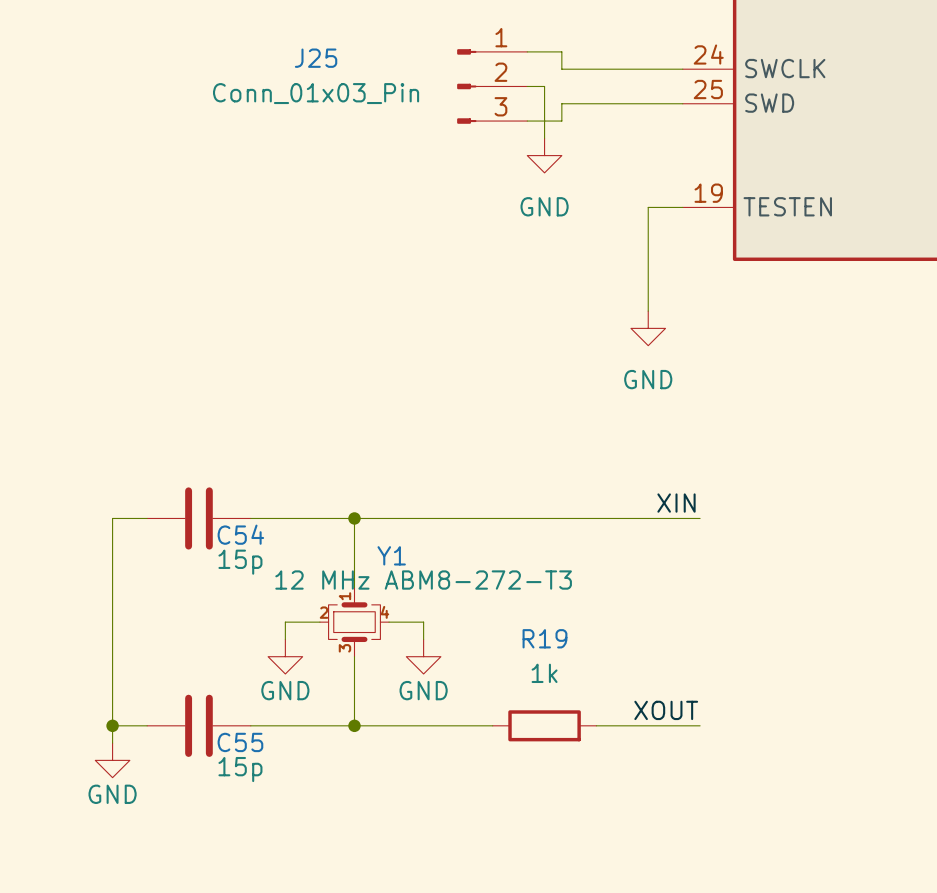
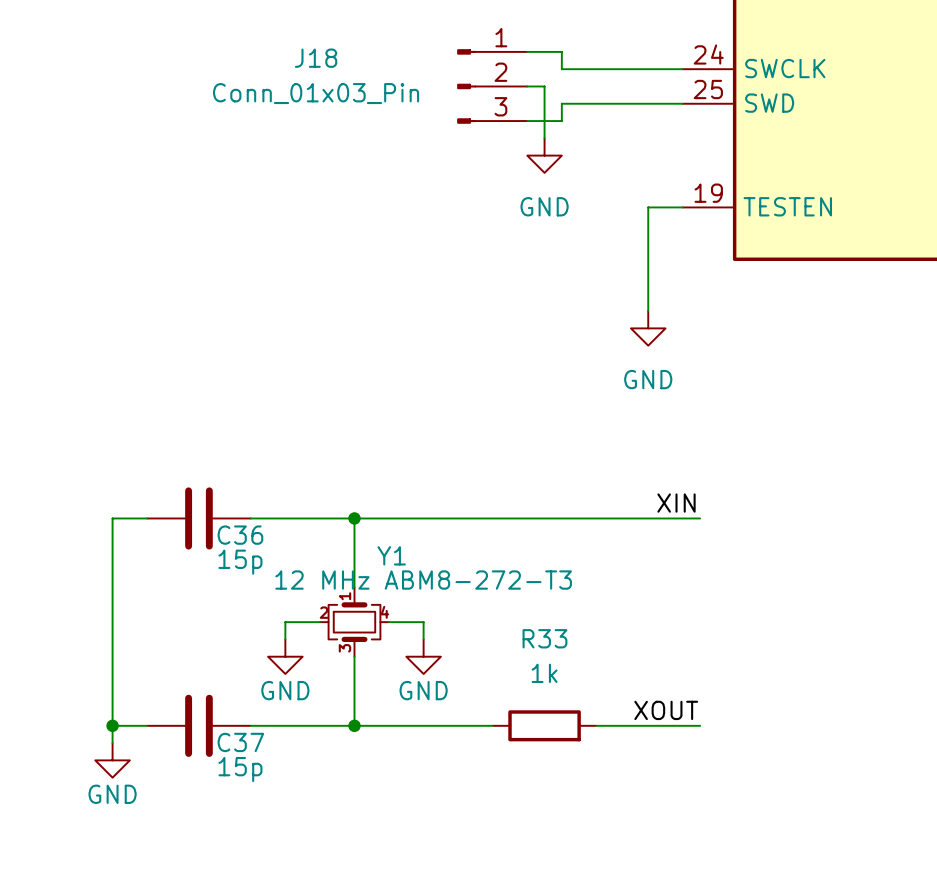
J25 name: J25 (316, 58) -> J18 (316, 58)
C54 name: C54 (240, 534) -> C36 (240, 535)
R19 name: R19 (544, 638) -> R33 (544, 638)
C55 name: C55 (240, 742) -> C37 (240, 742)

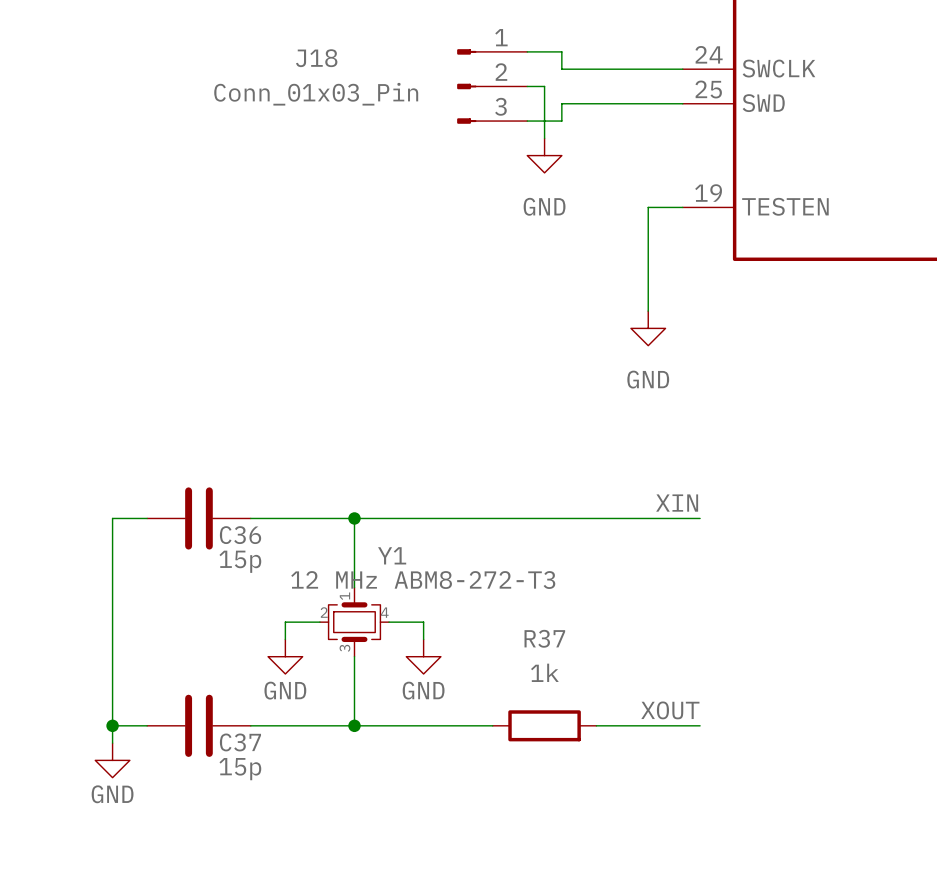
R33 name: R33 (544, 638) -> R37 (544, 638)

